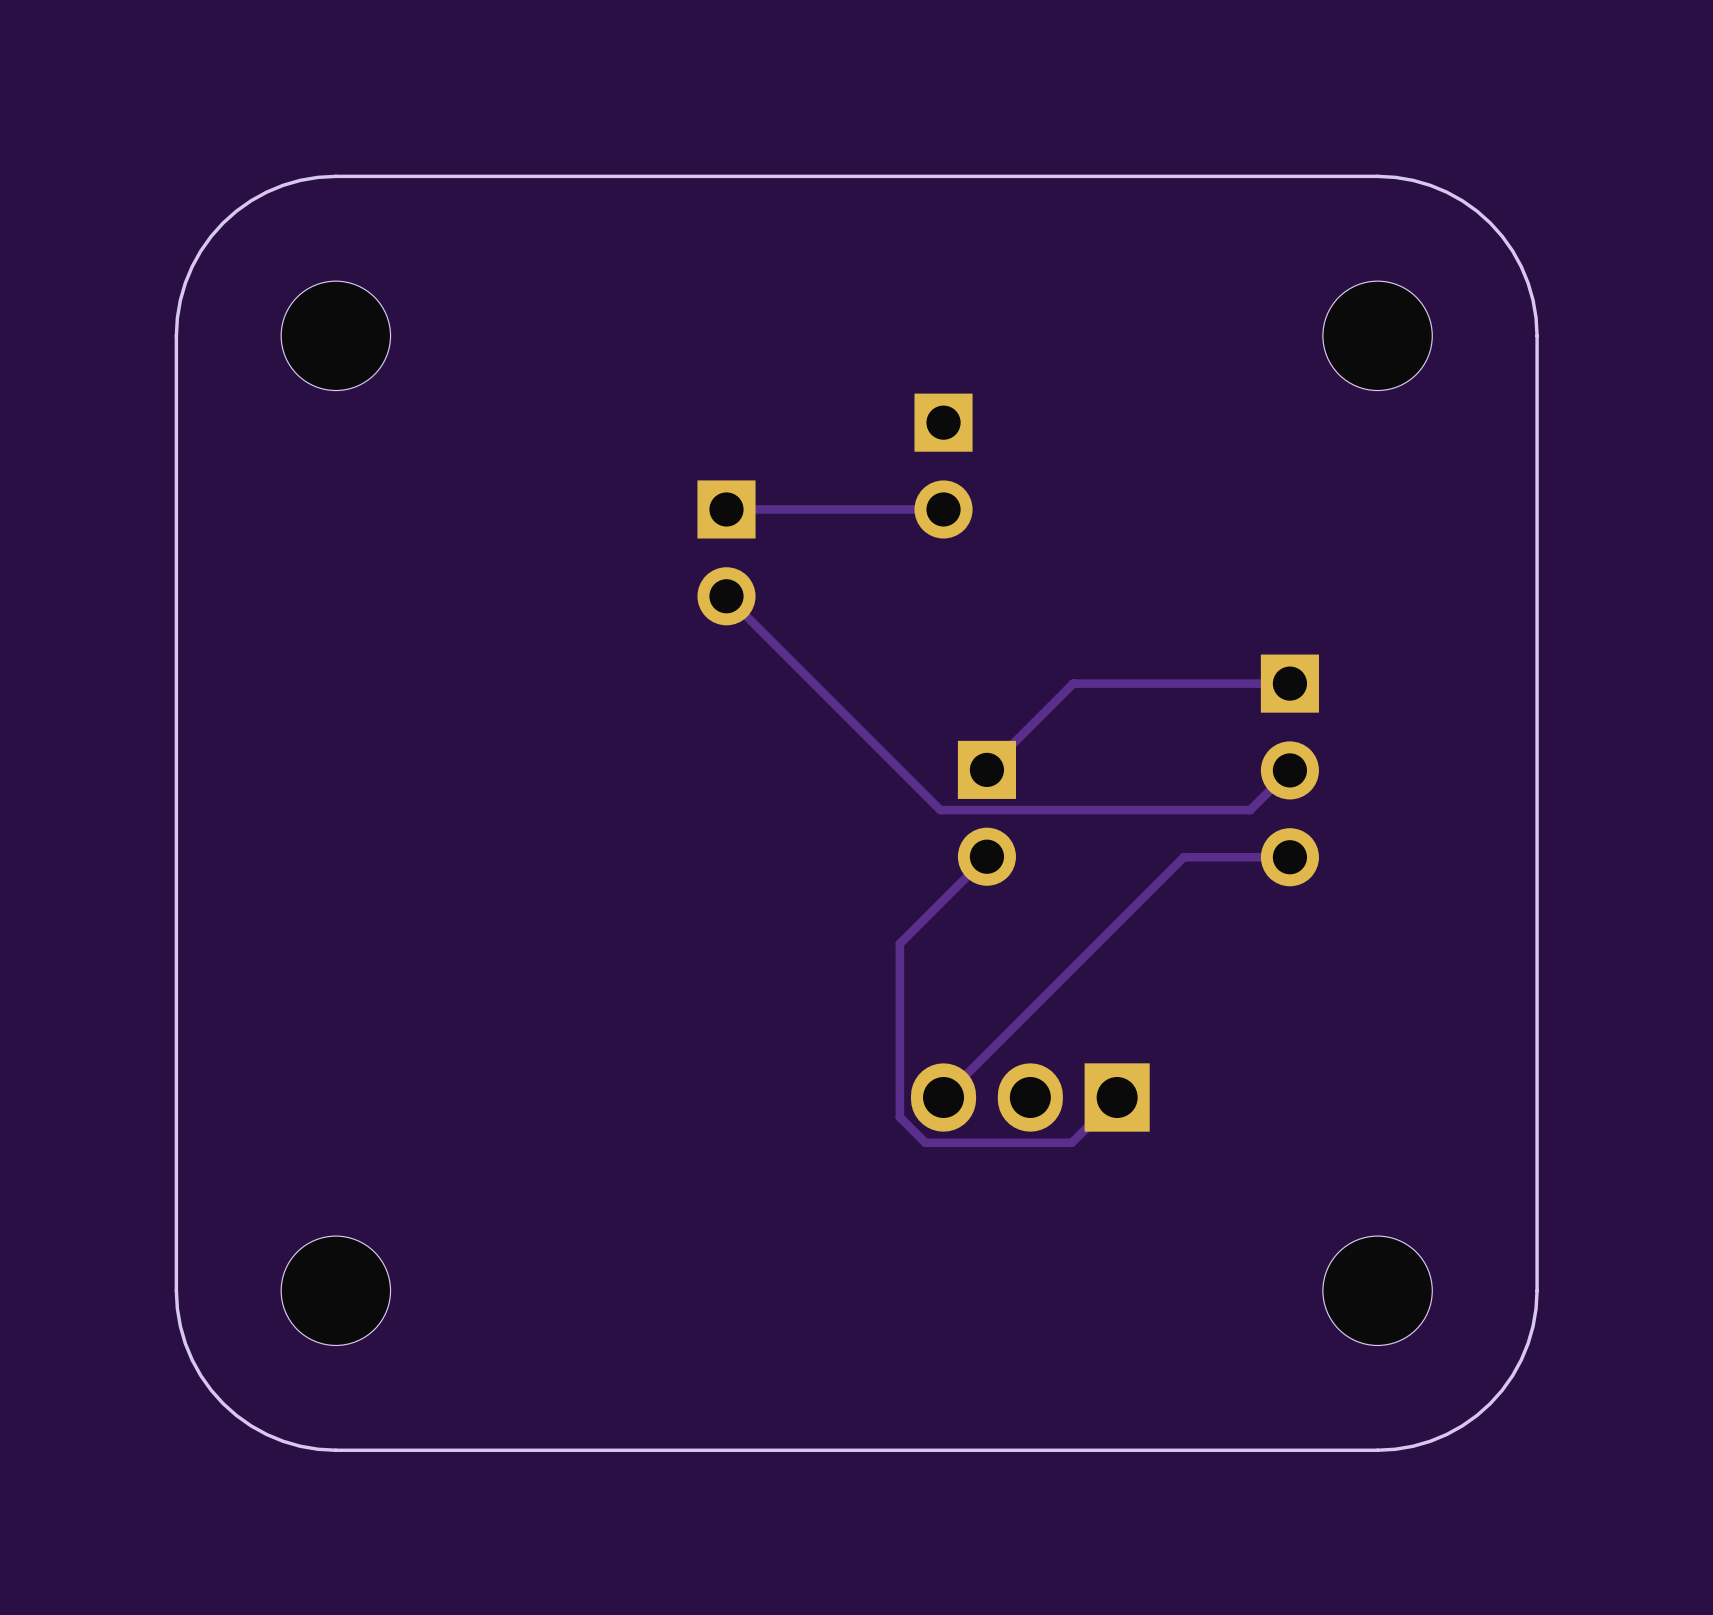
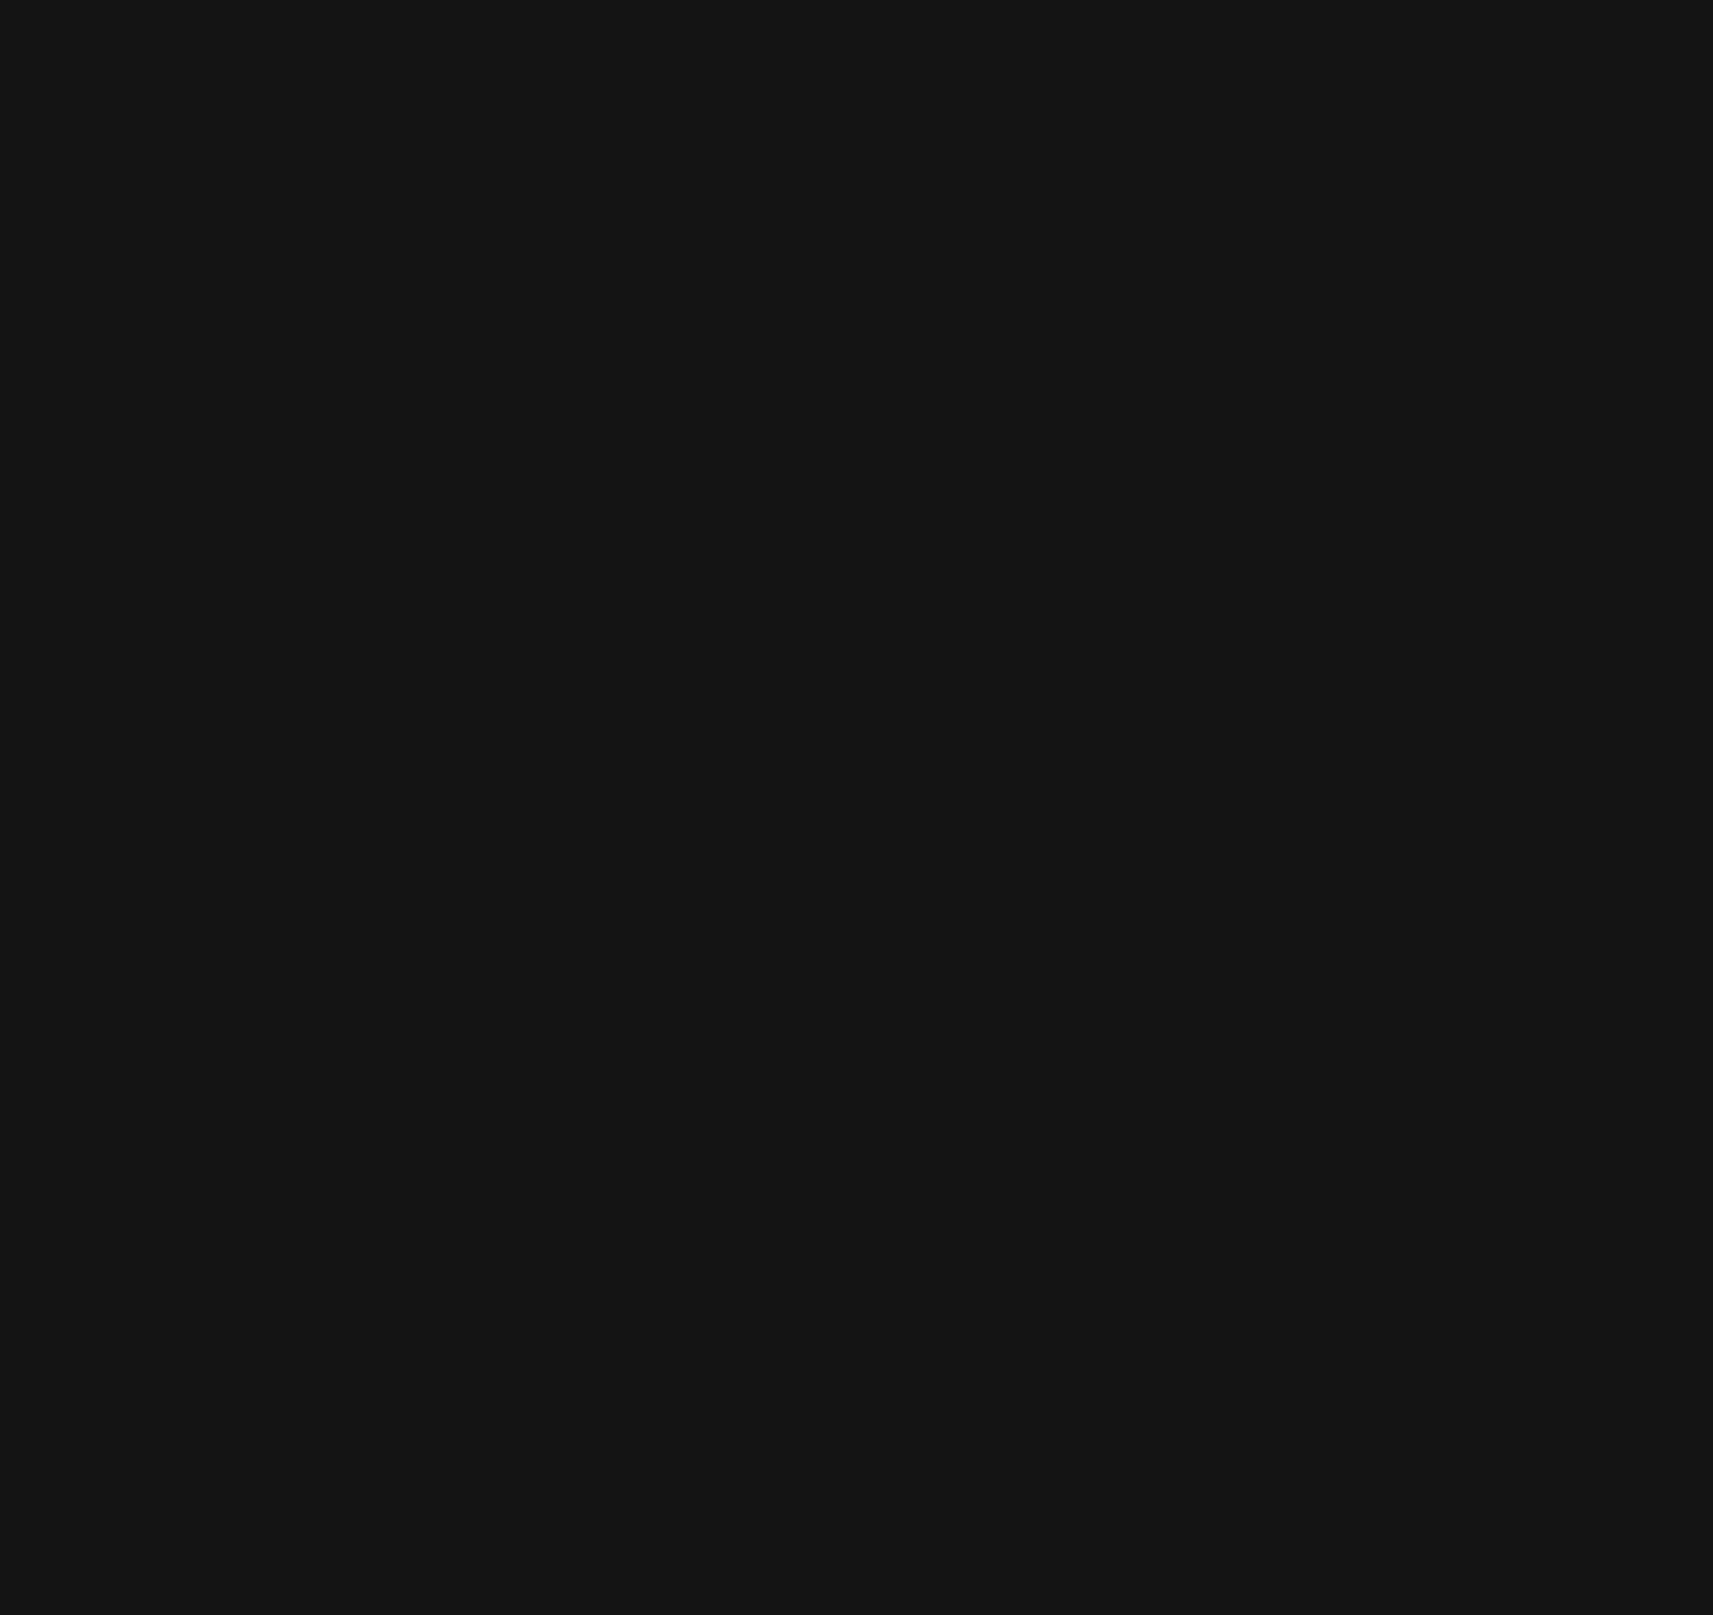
board edge: (1377, 176) (335, 176) (317, 177) (283, 185) (250, 200) (223, 223) (200, 250) (192, 266) (180, 300) (176, 335) (176, 1290) (177, 1308) (185, 1343) (200, 1375) (223, 1403) (250, 1425) (283, 1441) (317, 1449) (335, 1450) (1377, 1450) (1413, 1446) (1446, 1434) (1462, 1425) (1490, 1403) (1512, 1375) (1528, 1343) (1536, 1308) (1537, 1290) (1536, 317) (1528, 283) (1521, 266) (1502, 236) (1490, 223) (1462, 200) (1446, 192) (1413, 180) (1377, 176) -> none
part: (335, 335) -> none
part: (1377, 335) -> none
part: (943, 466) -> none
track: (943, 509) (726, 509) -> none
part: (726, 552) -> none
track: (726, 596) (940, 810) (1250, 810) (1289, 770) -> none
track: (1289, 683) (1073, 683) (986, 769) -> none
part: (1289, 770) -> none
part: (986, 813) -> none
track: (986, 856) (899, 943) (899, 1117) (925, 1142) (1071, 1142) (1117, 1097) -> none
track: (1289, 857) (1183, 857) (943, 1097) -> none
part: (1030, 1097) -> none
part: (335, 1290) -> none
part: (1377, 1290) -> none

